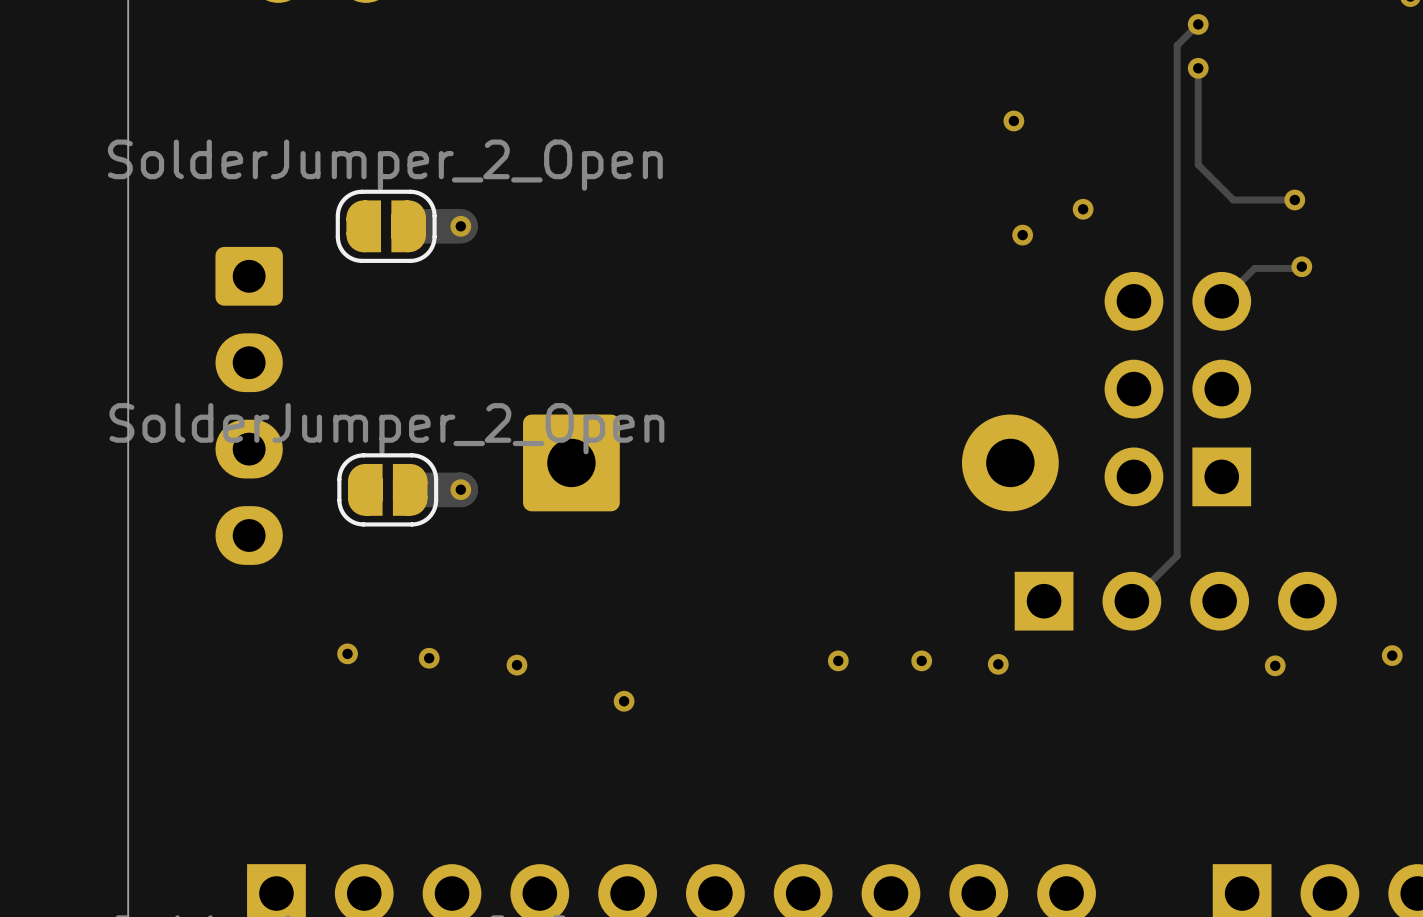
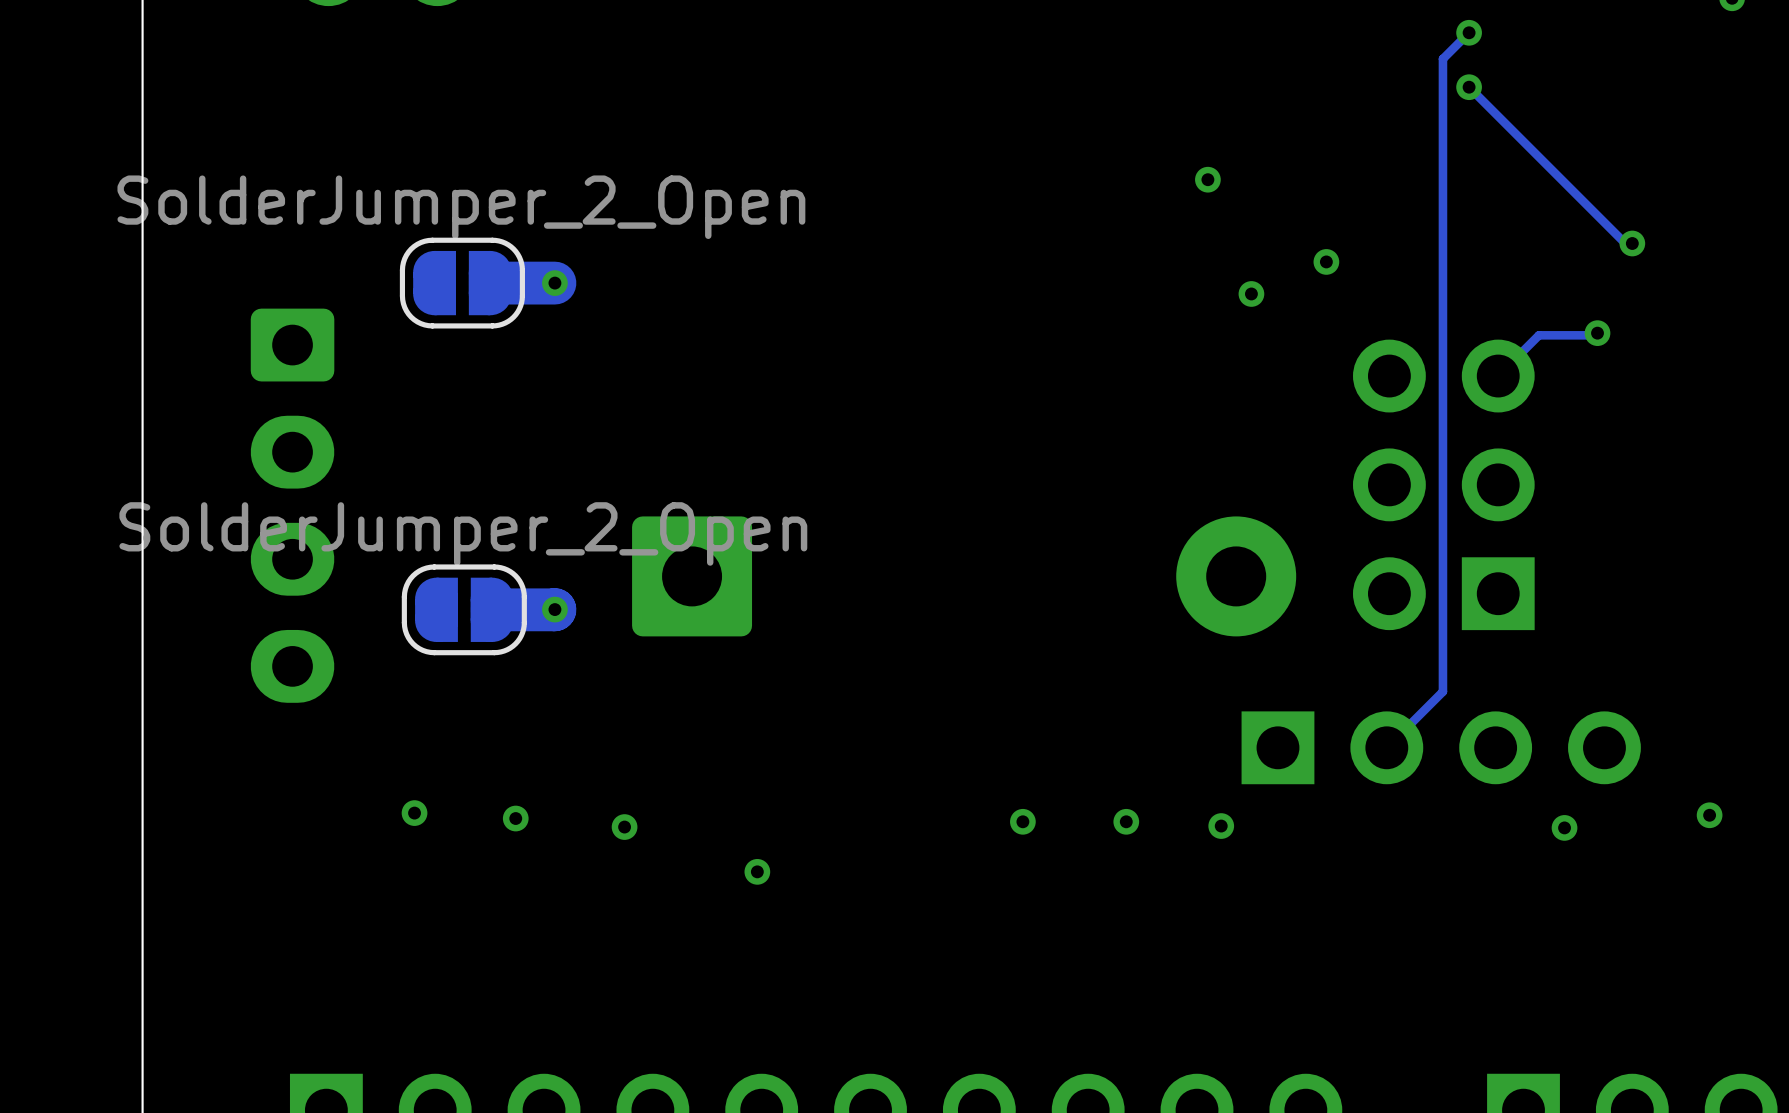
track: (1198, 68) (1198, 164) (1233, 199) (1294, 199) -> (1469, 87) (1625, 243) (1632, 243)
via position: (1013, 120) -> (1207, 179)
via position: (1294, 199) -> (1632, 243)

